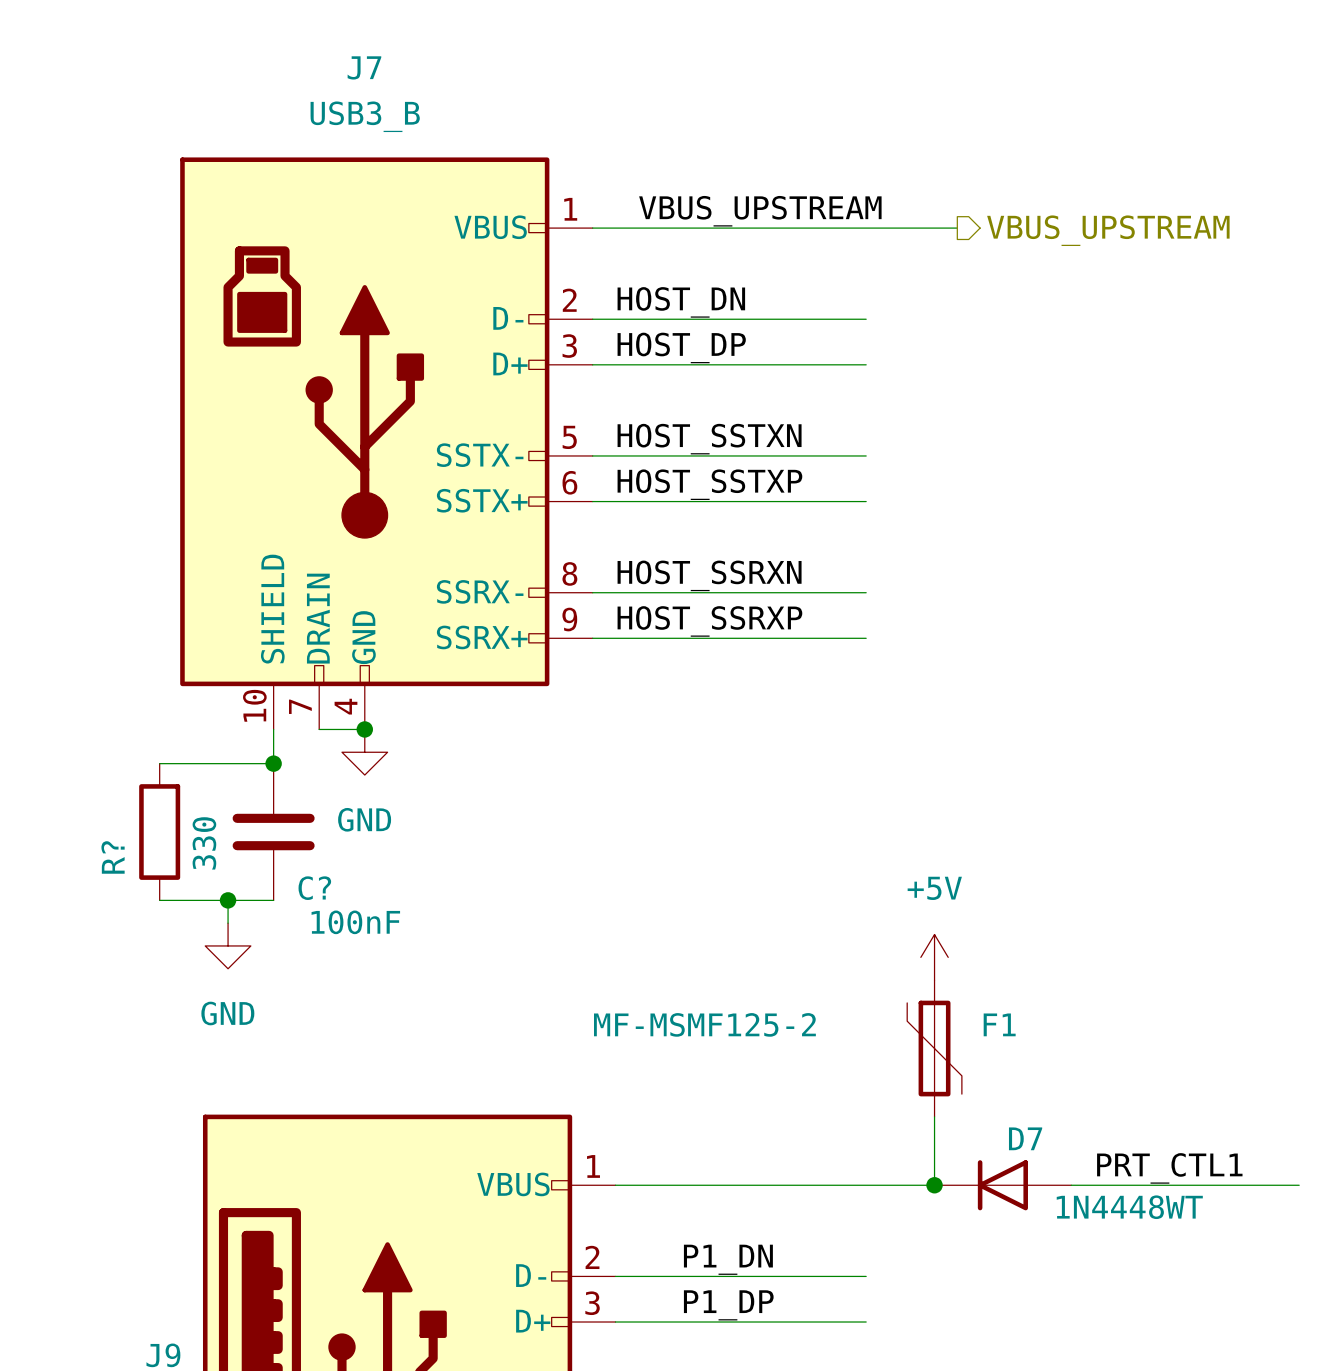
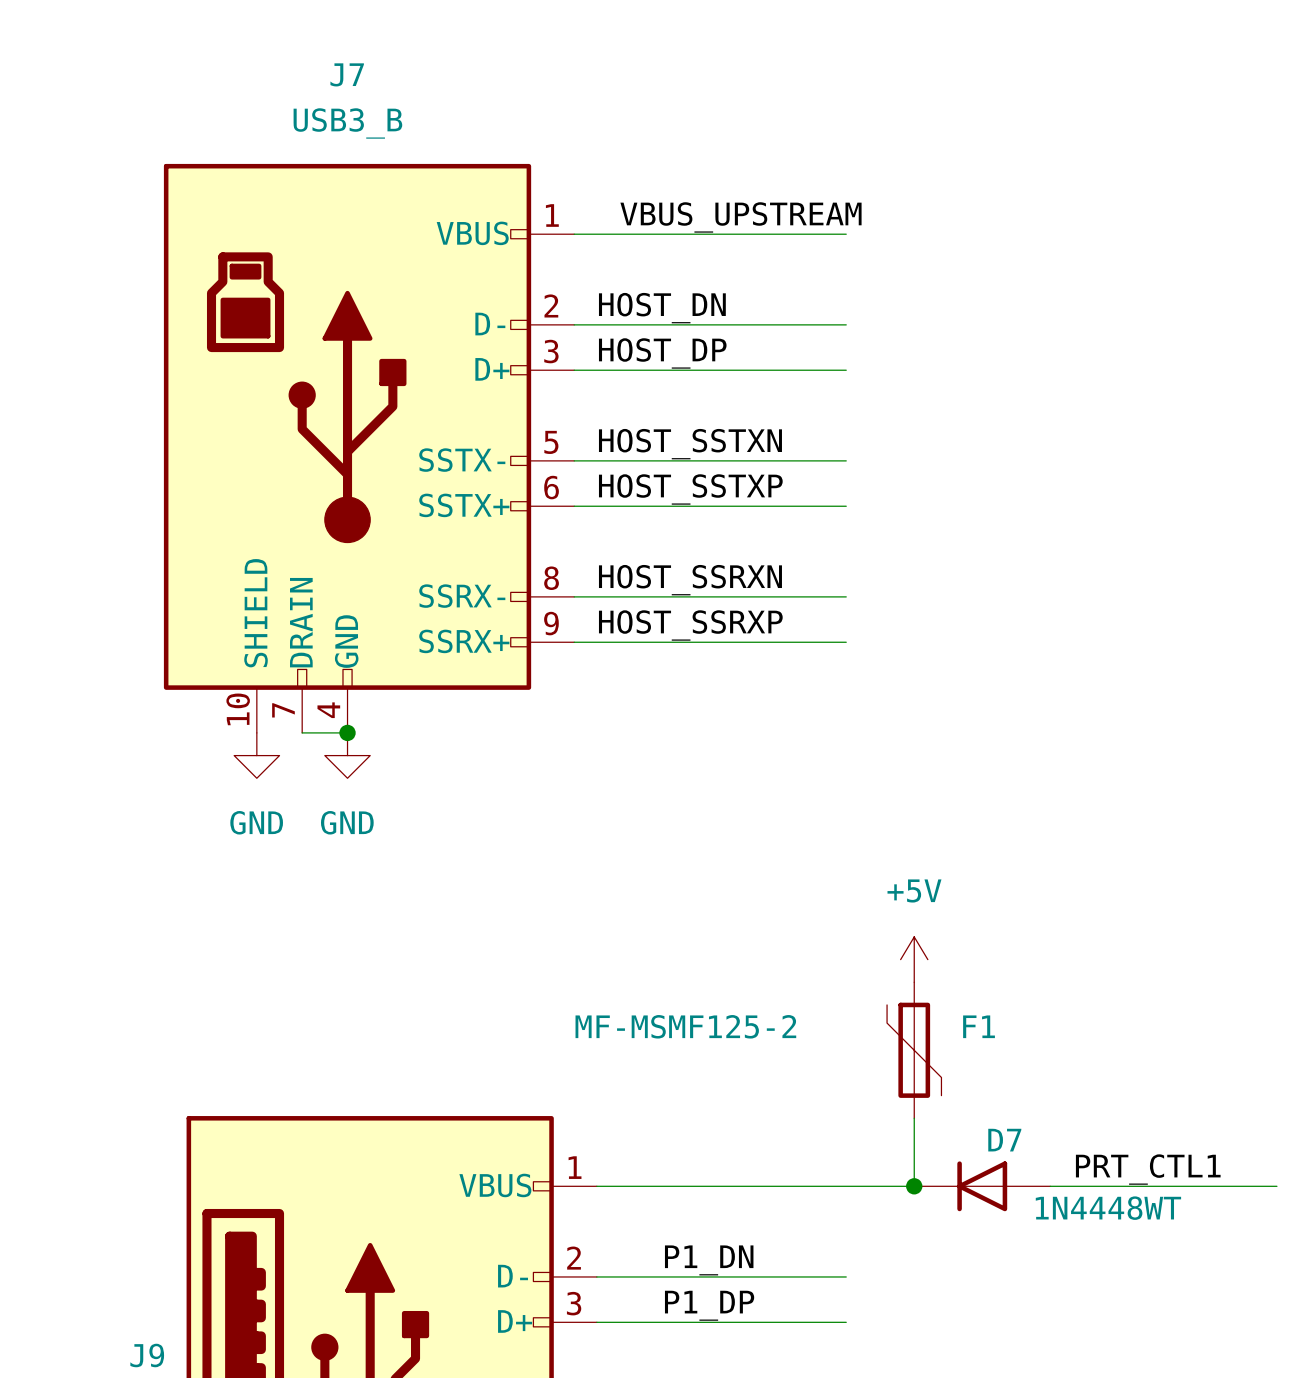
wire: (866, 228) (957, 228) -> none
hierarchical label: VBUS_UPSTREAM (1108, 230) -> none
wire: (273, 729) (273, 763) (159, 763) -> none
junction: (273, 763) -> none
R?: 330 (159, 832) -> none
C?: 100nF (273, 832) -> none
wire: (159, 900) (273, 900) -> none
wire: (228, 900) (228, 923) -> none
junction: (228, 900) -> none
power symbol position: GND (228, 945) -> GND (256, 755)

